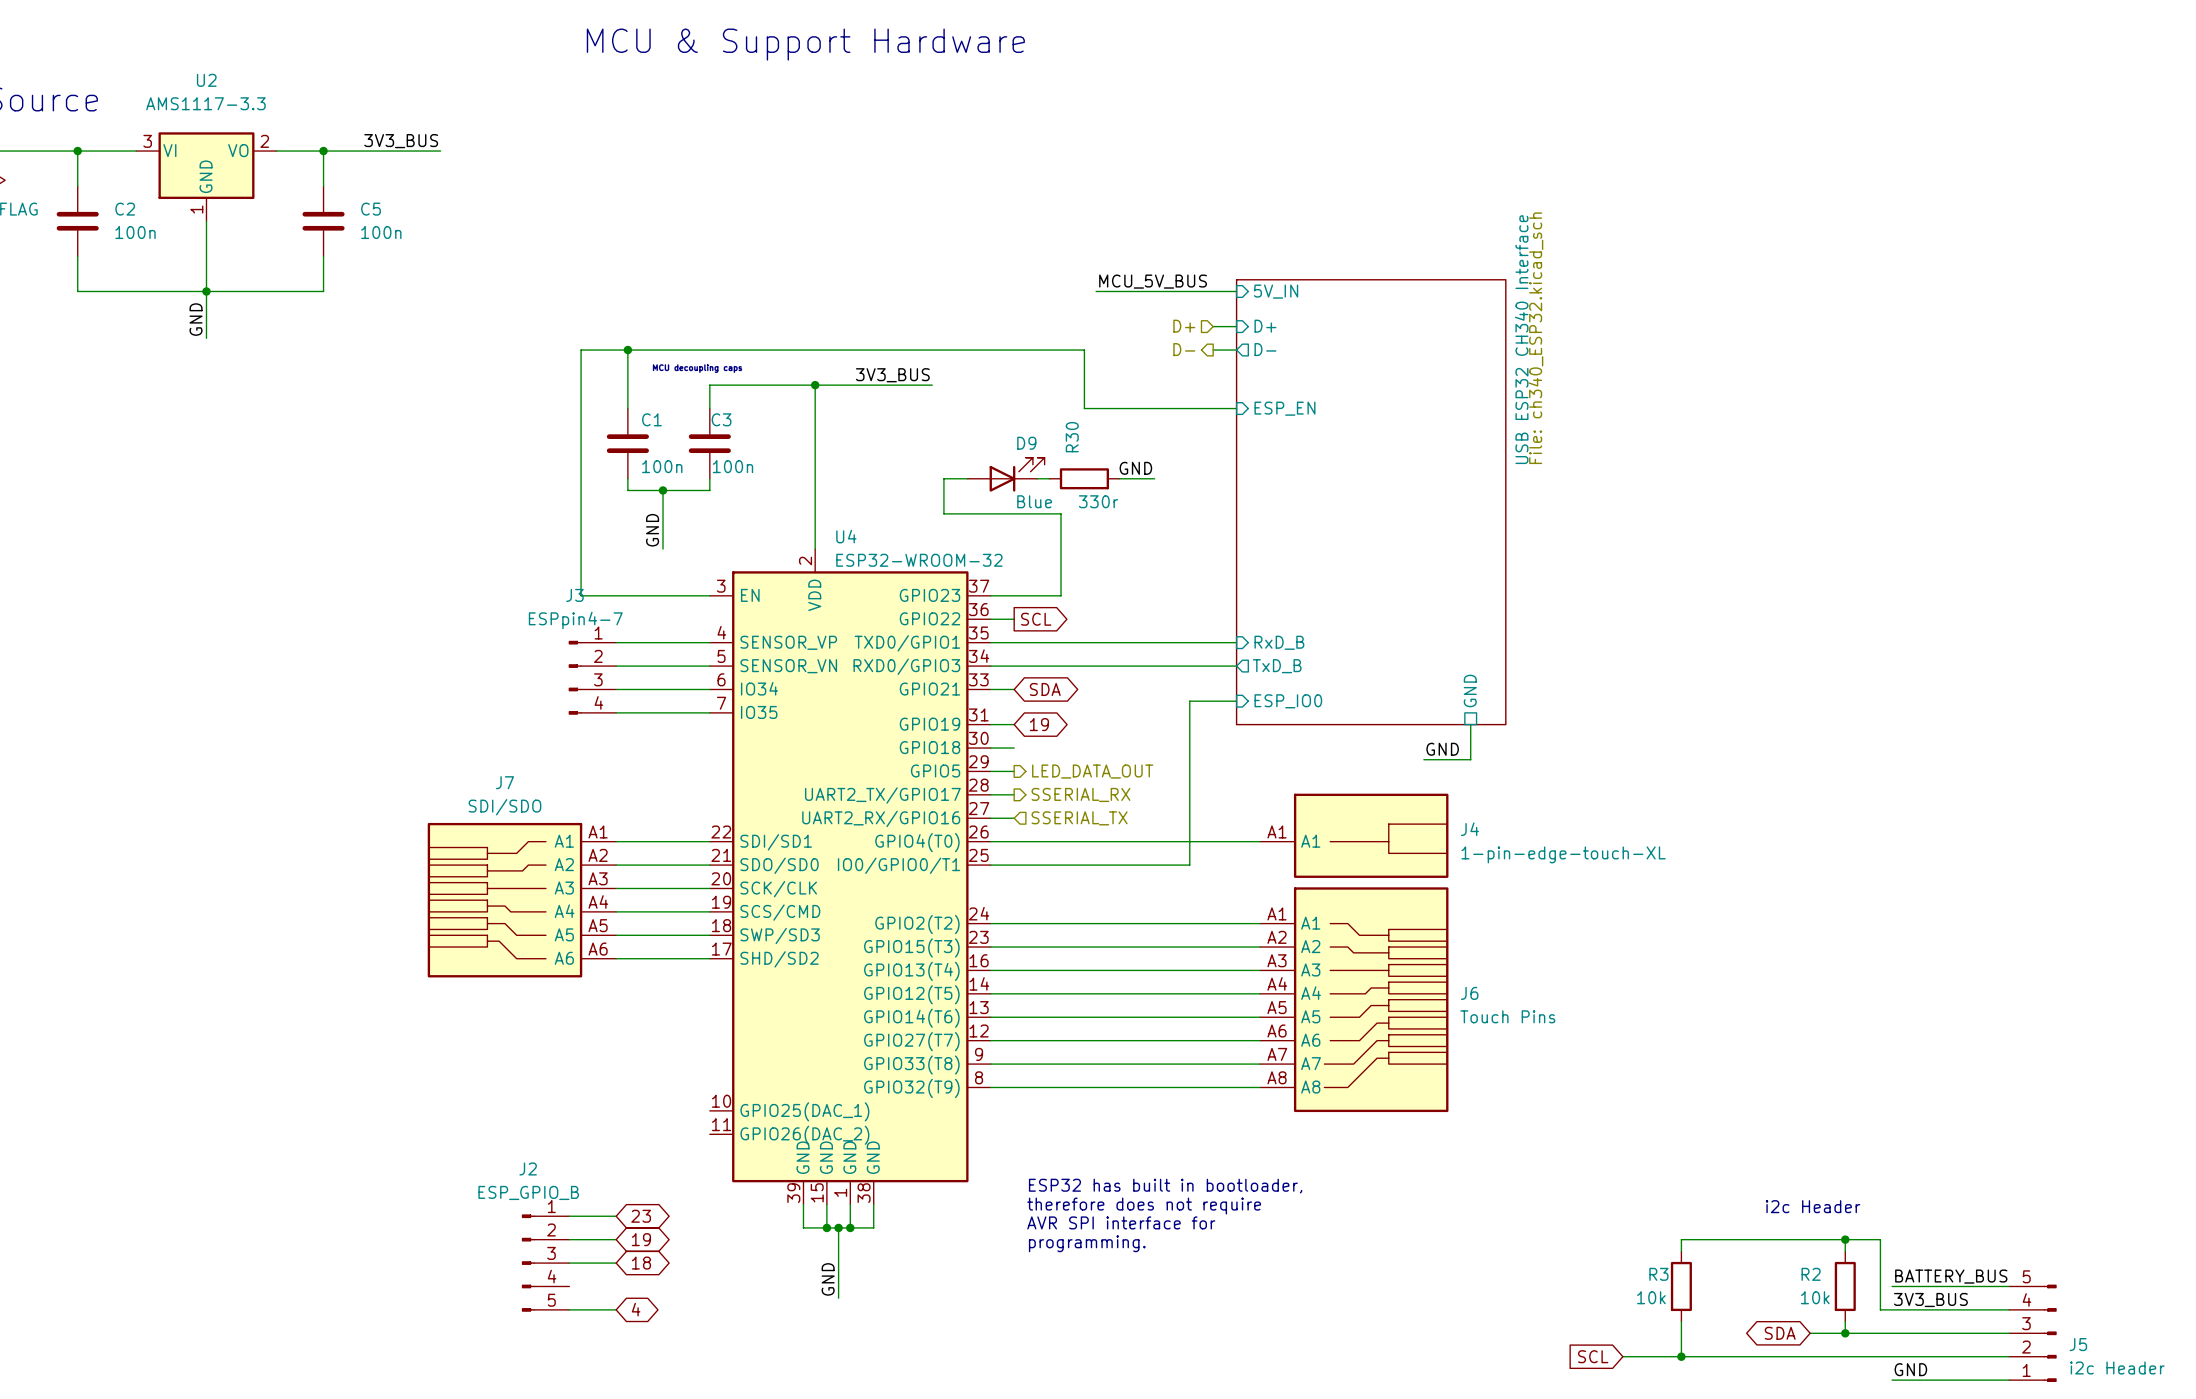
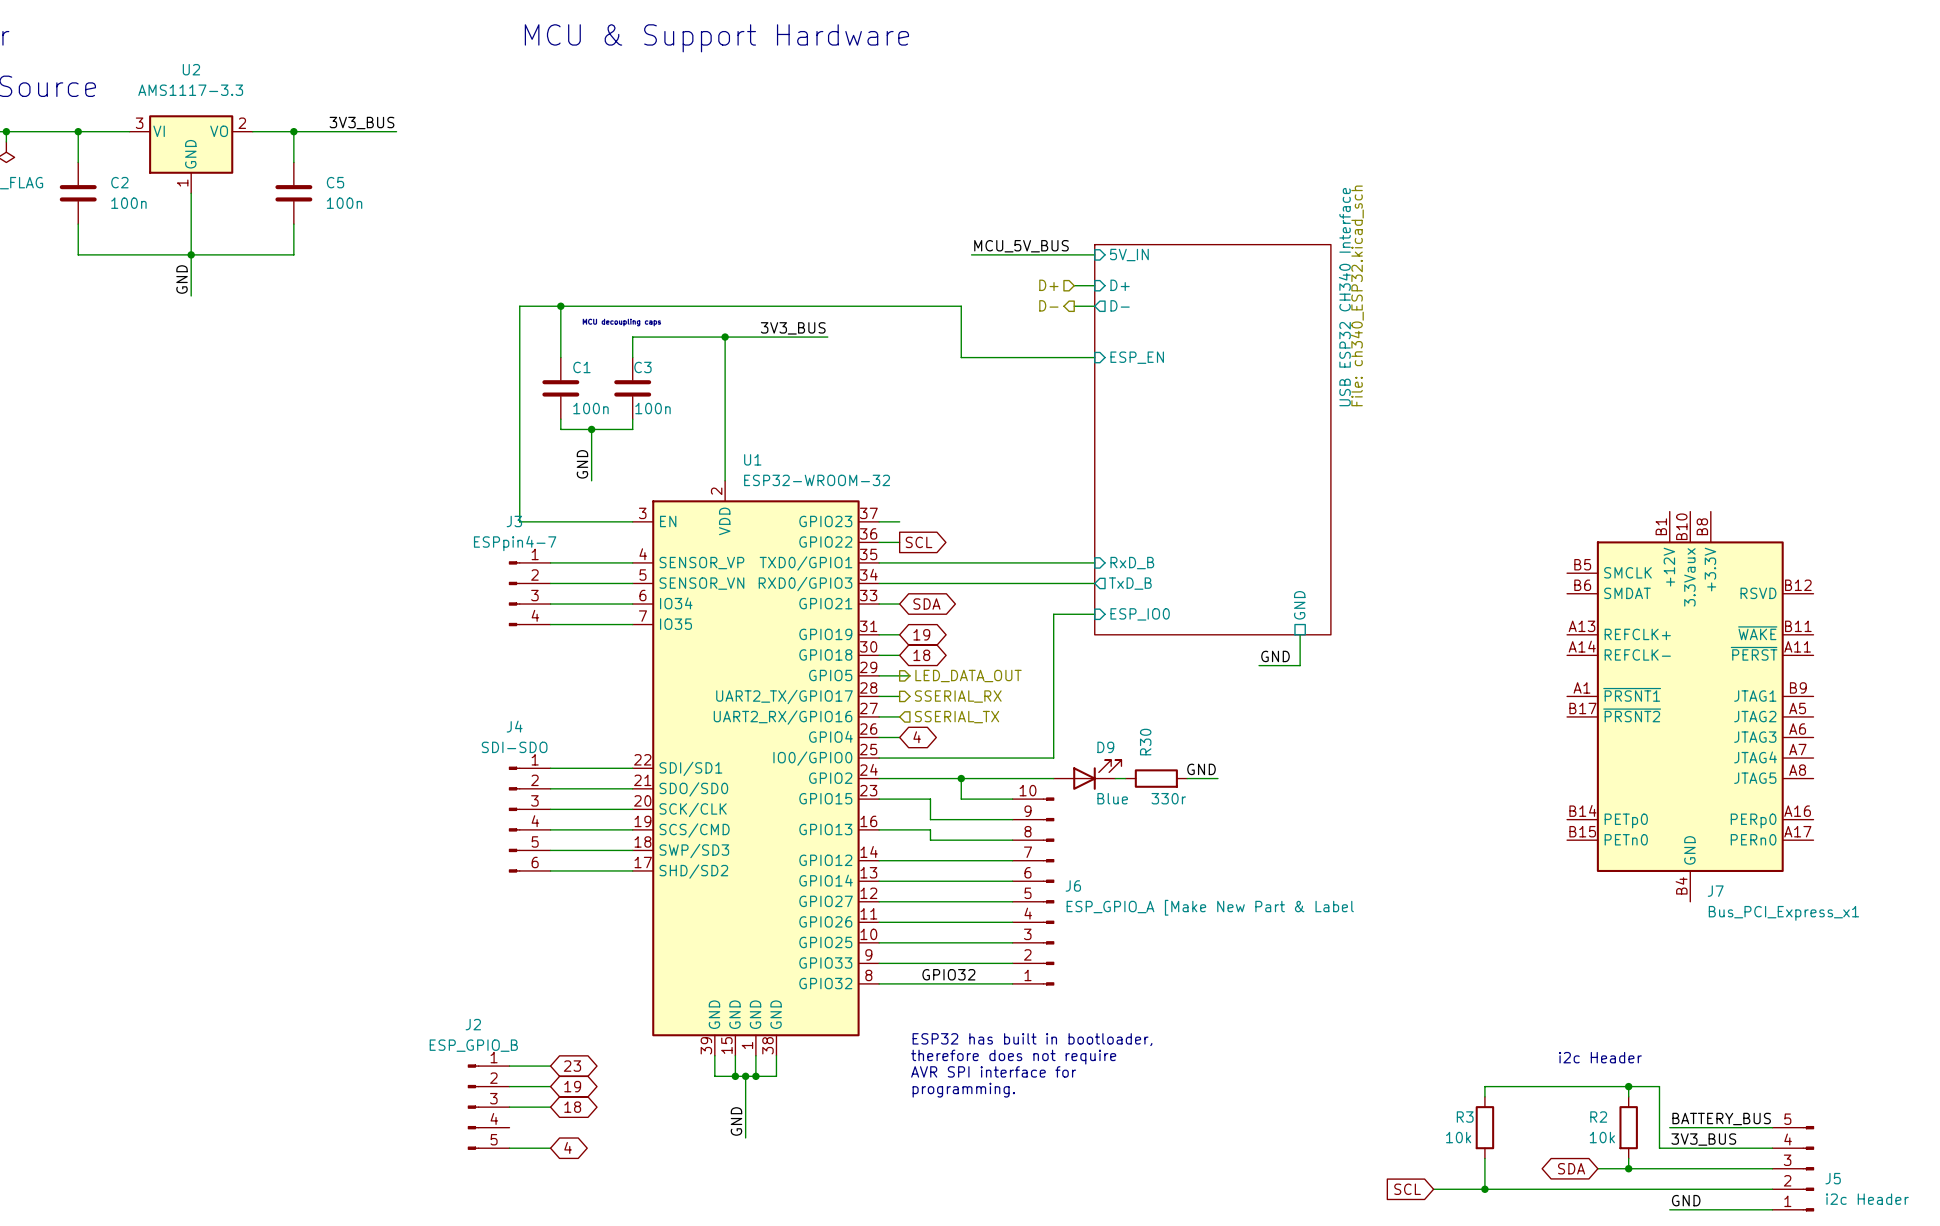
label: GND (1135, 468) -> none
D9 position: (1005, 474) -> (1087, 774)
wire: (967, 478) (943, 478) (943, 513) (1061, 513) (1061, 595) (1014, 595) -> none
wire: (1037, 478) (1049, 478) -> none
R30 position: (1084, 478) -> (1156, 778)
wire: (1119, 478) (1154, 478) -> none
global label: none -> 18 (921, 655)
wire: none -> (899, 675) (909, 675)
J7 name position: J7 (504, 782) -> J7 (1715, 891)
J4 symbol: [1260, 793, 1449, 878] -> [508, 766, 551, 873]
J7 value: SDI/SDO (504, 807) -> Bus_PCI_Express_x1 (1783, 913)
J7 symbol: [427, 822, 617, 978] -> [1567, 511, 1814, 902]
J4 name position: J4 (1469, 829) -> J4 (514, 726)
wire: (616, 841) (709, 841) -> (550, 768) (632, 768)
wire: (1014, 841) (1260, 841) -> none
global label: none -> 4 (917, 737)
J4 value: 1-pin-edge-touch-XL (1563, 854) -> SDI-SDO (514, 747)
wire: (616, 865) (709, 865) -> (550, 788) (632, 788)
U4: ESP32-WROOM-32 (850, 876) -> none
U1: none -> ESP32-WROOM-32 (755, 768)
label: none -> GND (1201, 769)
J6 symbol: [1260, 887, 1449, 1113] -> [1012, 797, 1055, 986]
wire: (616, 888) (709, 888) -> (550, 809) (632, 809)
wire: none -> (879, 778) (1053, 778)
wire: none -> (961, 778) (961, 799) (1012, 799)
junction: none -> (961, 778)
wire: none -> (1115, 778) (1125, 778)
wire: (616, 911) (709, 911) -> (550, 829) (632, 829)
wire: none -> (879, 799) (930, 799) (930, 819) (1012, 819)
wire: (990, 923) (1260, 923) -> none
wire: (616, 935) (709, 935) -> (550, 850) (632, 850)
wire: (1049, 947) (1260, 947) -> (930, 829) (930, 840) (1012, 840)
wire: (616, 958) (709, 958) -> (550, 870) (632, 870)
wire: (990, 970) (1260, 970) -> none
wire: none -> (879, 860) (1012, 860)
wire: (990, 993) (1260, 993) -> none
J6 name position: J6 (1469, 993) -> J6 (1073, 885)
wire: none -> (879, 881) (1012, 881)
J6 value: Touch Pins (1507, 1016) -> ESP_GPIO_A [Make New Part & Label (1210, 907)
wire: (990, 1017) (1260, 1017) -> none
wire: none -> (879, 901) (1012, 901)
wire: (990, 1040) (1260, 1040) -> none
wire: none -> (879, 922) (1012, 922)
wire: (990, 1064) (1260, 1064) -> none
wire: none -> (879, 942) (1012, 942)
wire: (990, 1087) (1260, 1087) -> none
wire: none -> (879, 963) (1012, 963)
label: none -> GPIO32 (948, 974)
wire: none -> (879, 983) (1012, 983)

